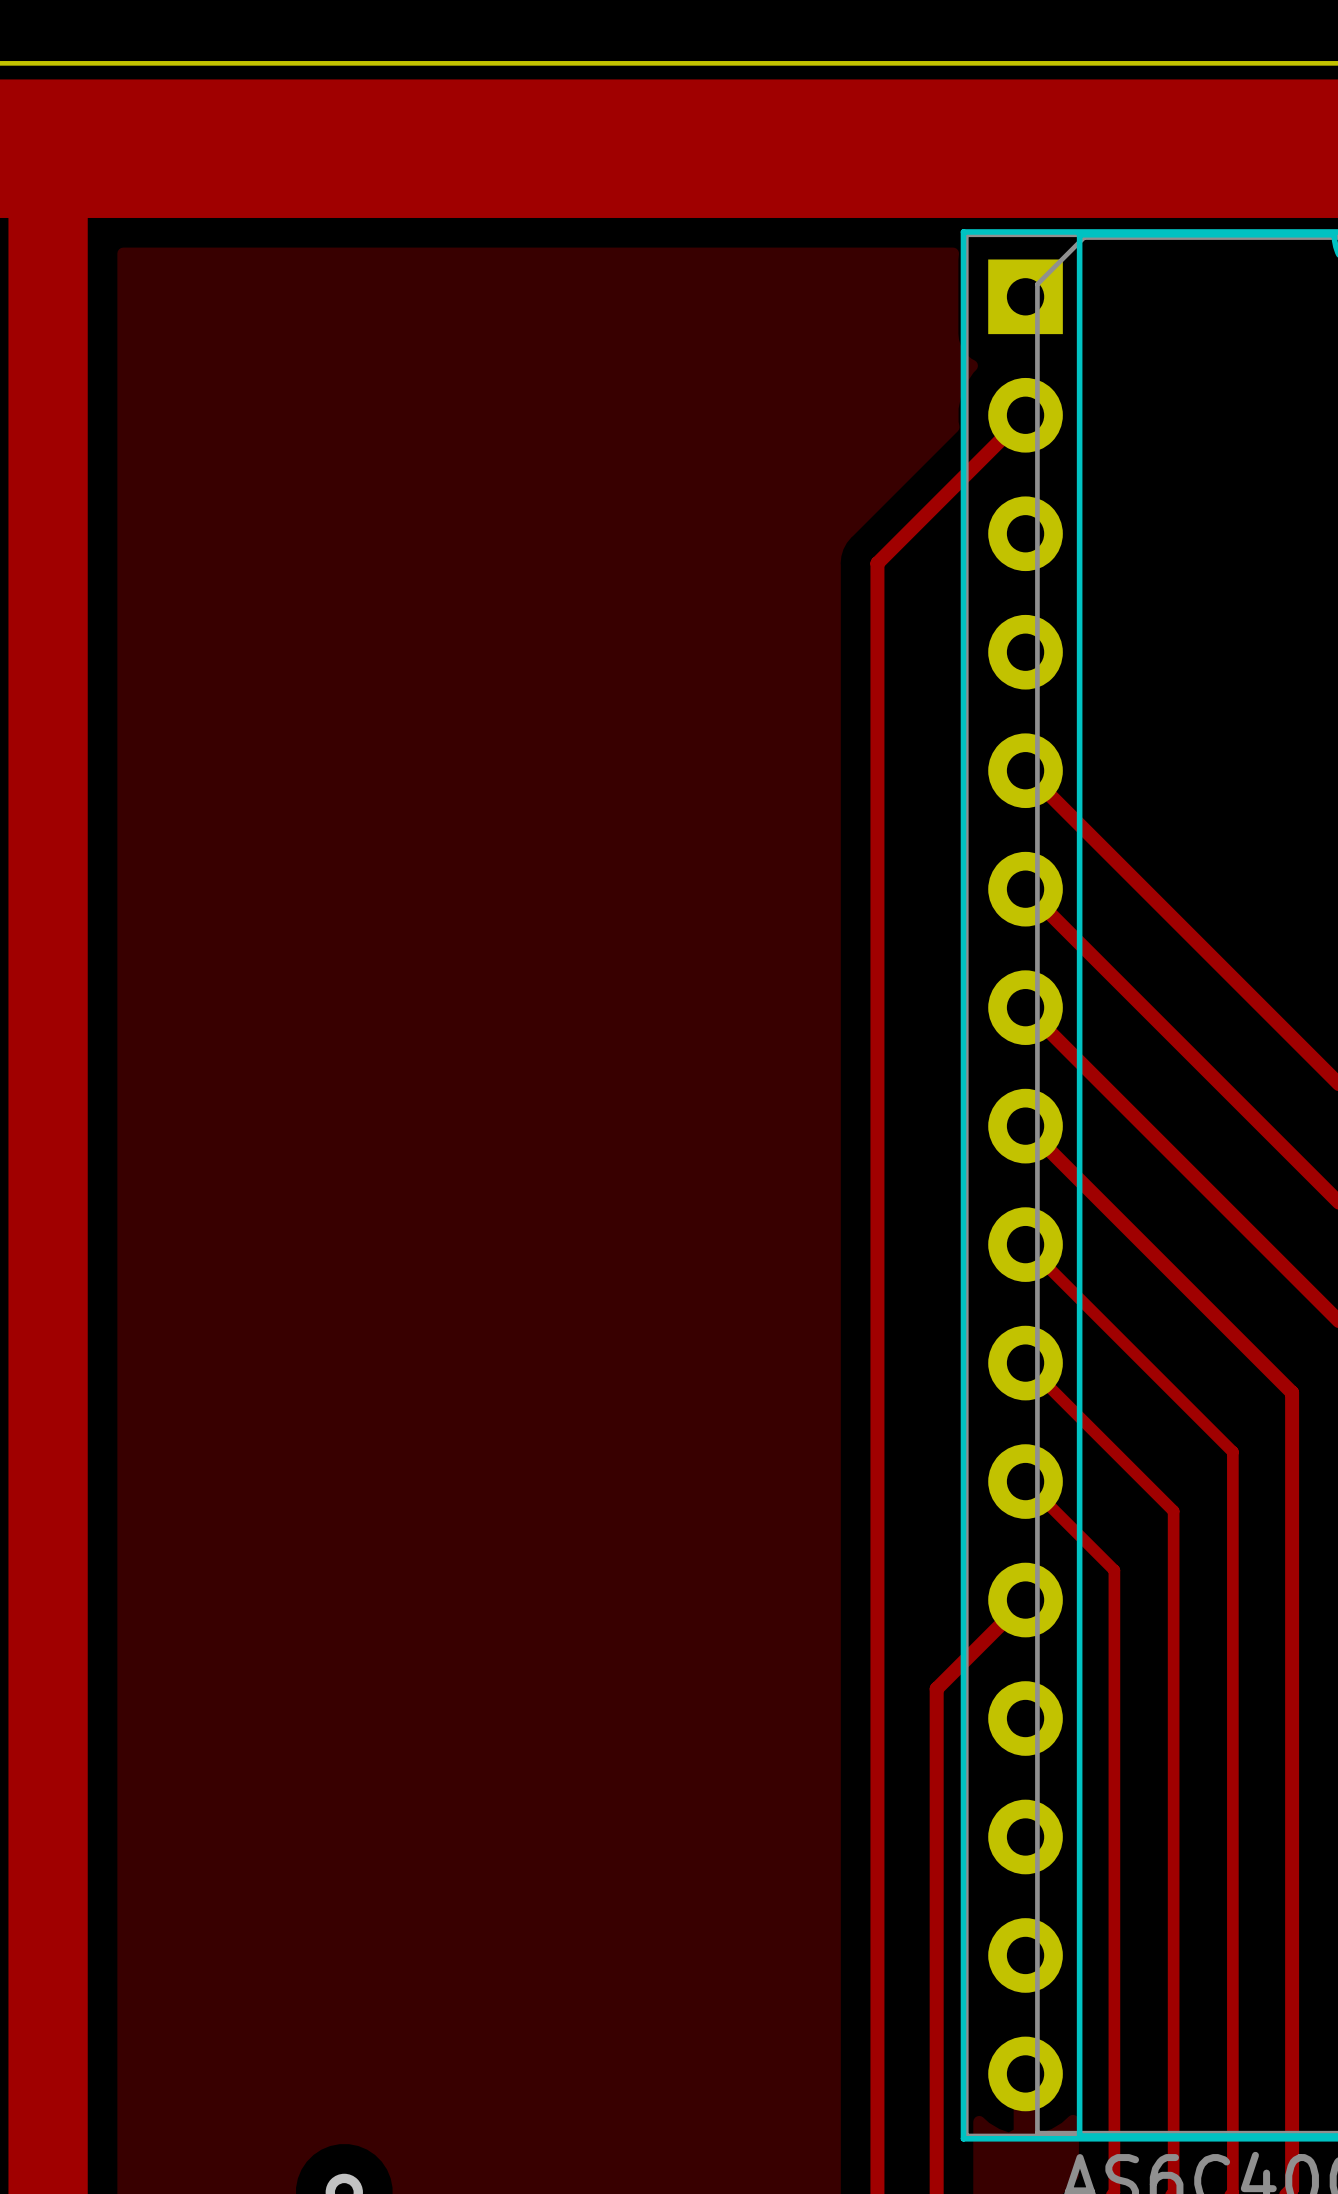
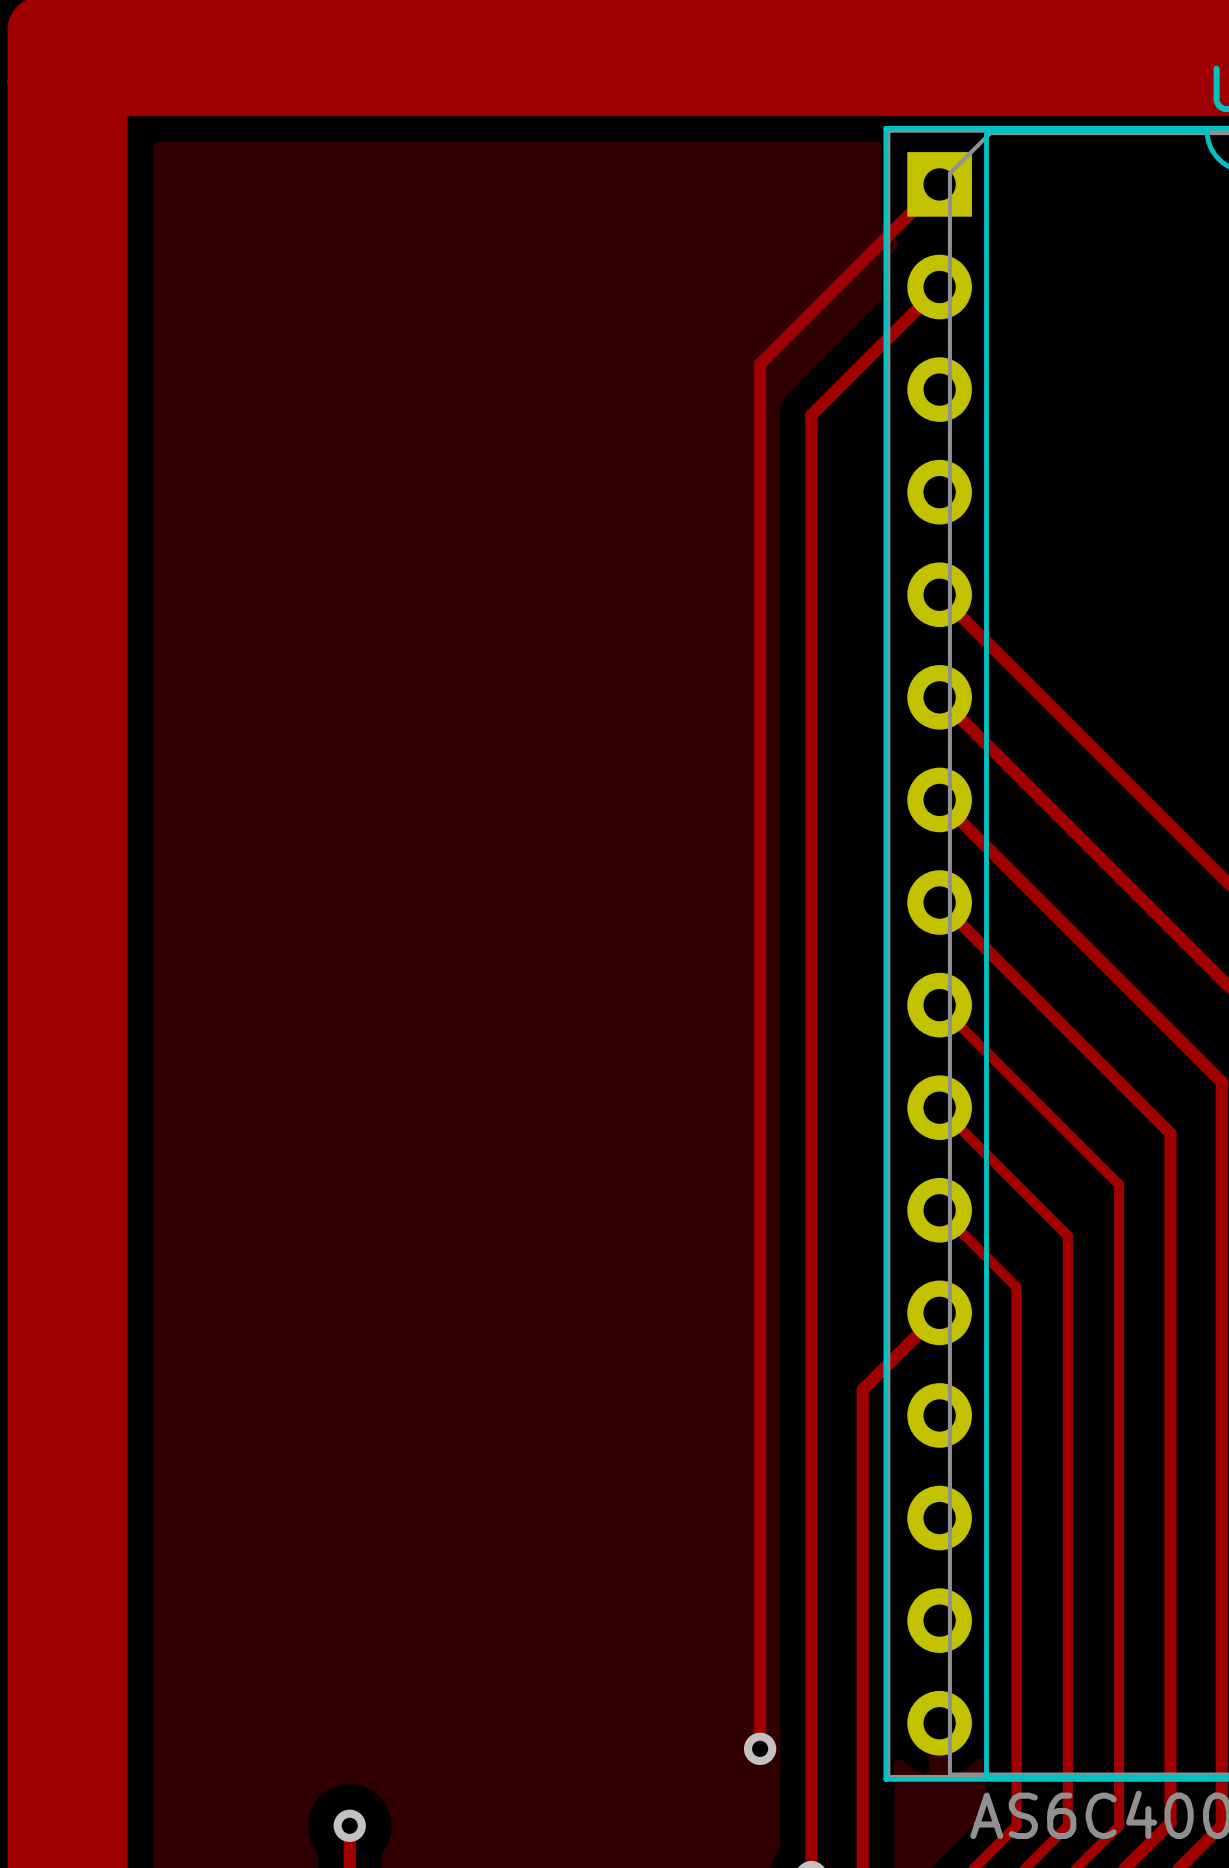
track: none -> (939, 184) (760, 363) (760, 1748)
via: none -> (760, 1748)

